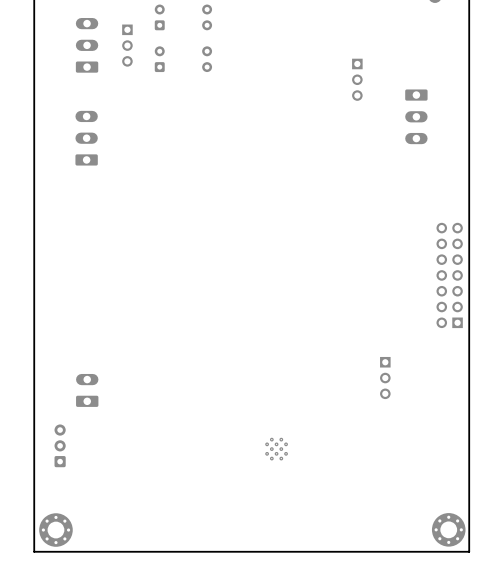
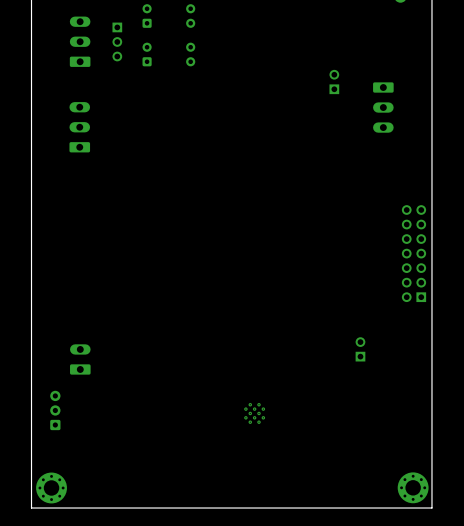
part: (357, 79) -> none
part: none -> (334, 81)
part: (385, 378) -> none
part: none -> (360, 349)

